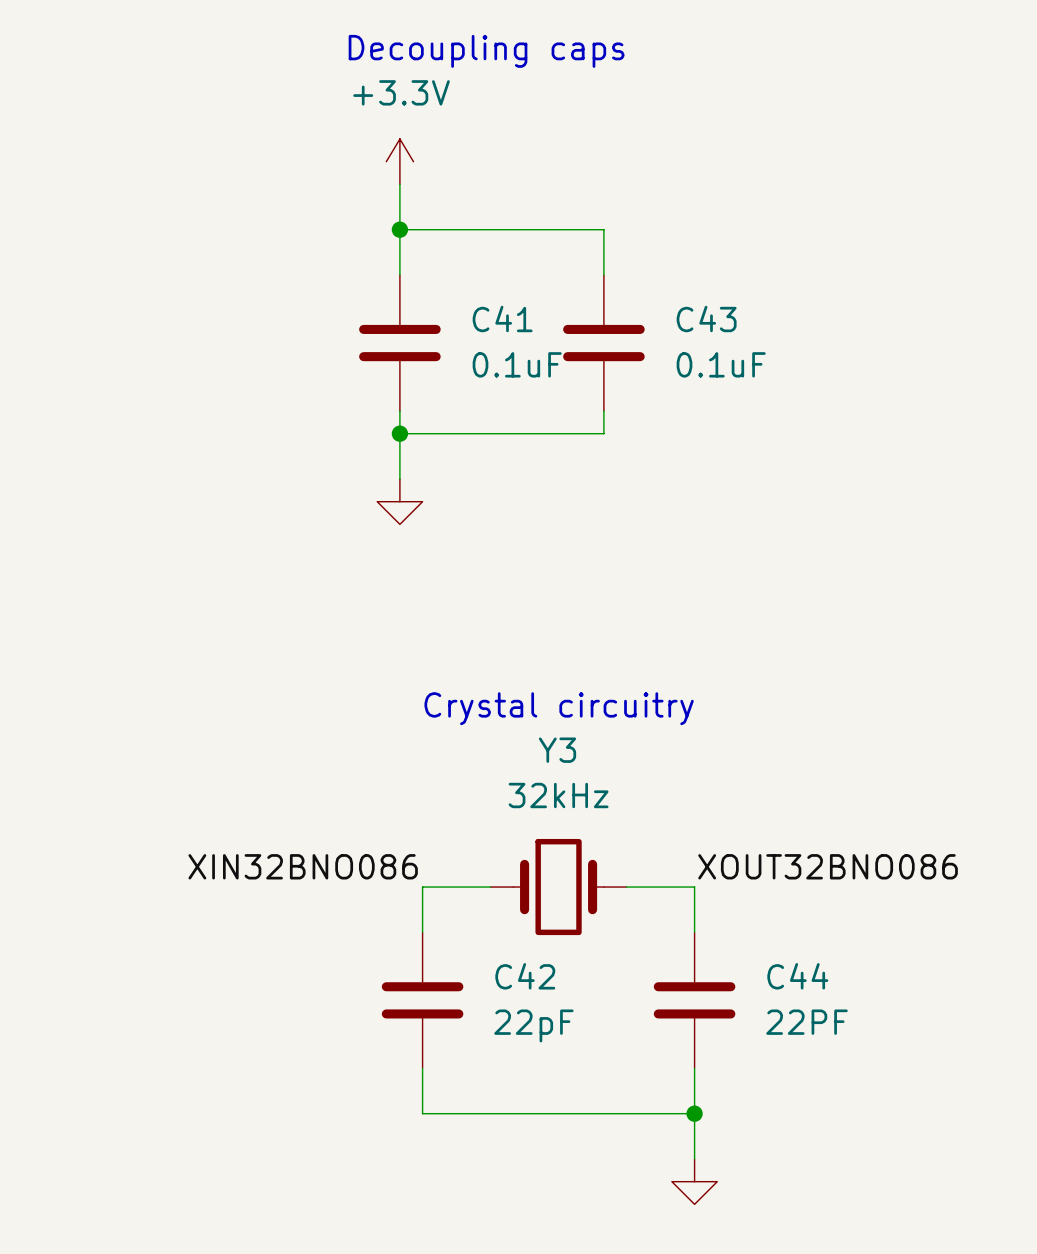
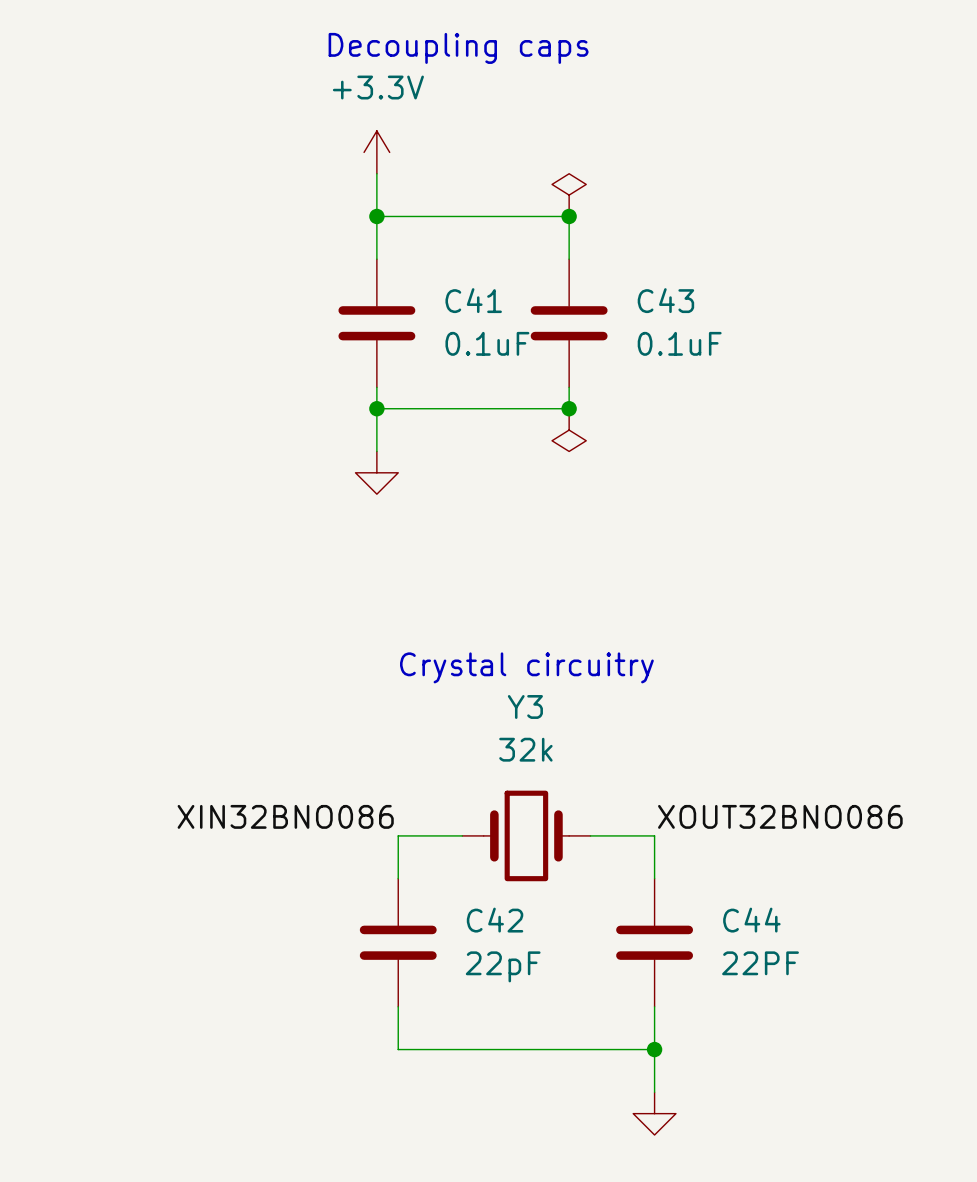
power symbol: none -> (569, 195)
junction: none -> (569, 216)
junction: none -> (569, 408)
power symbol: none -> (569, 430)
Y3 value: 32kHz (558, 795) -> 32k (525, 749)

